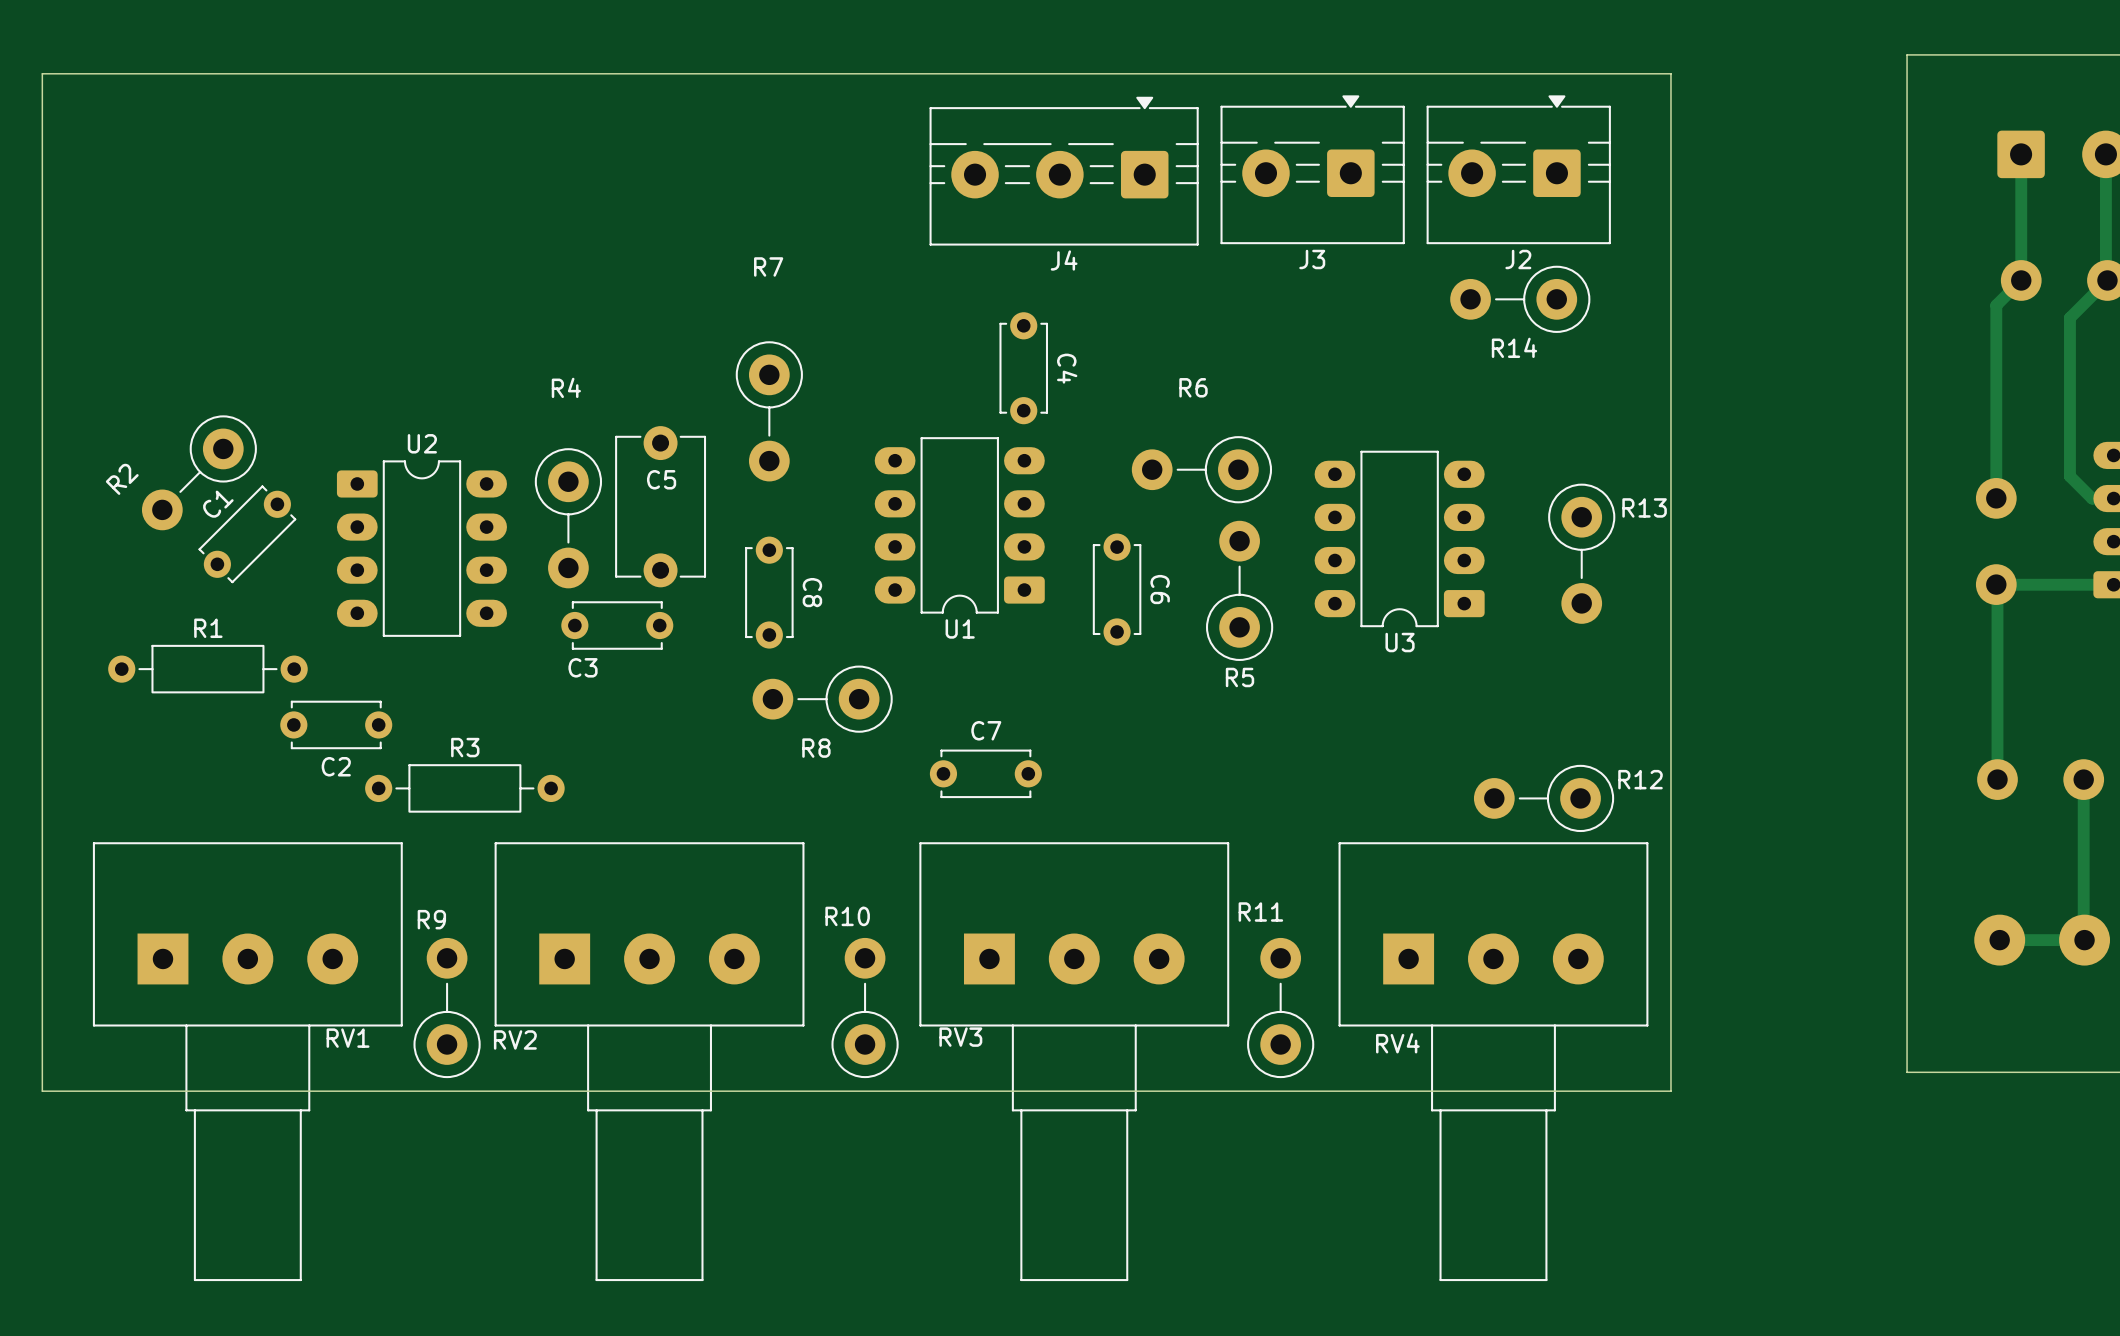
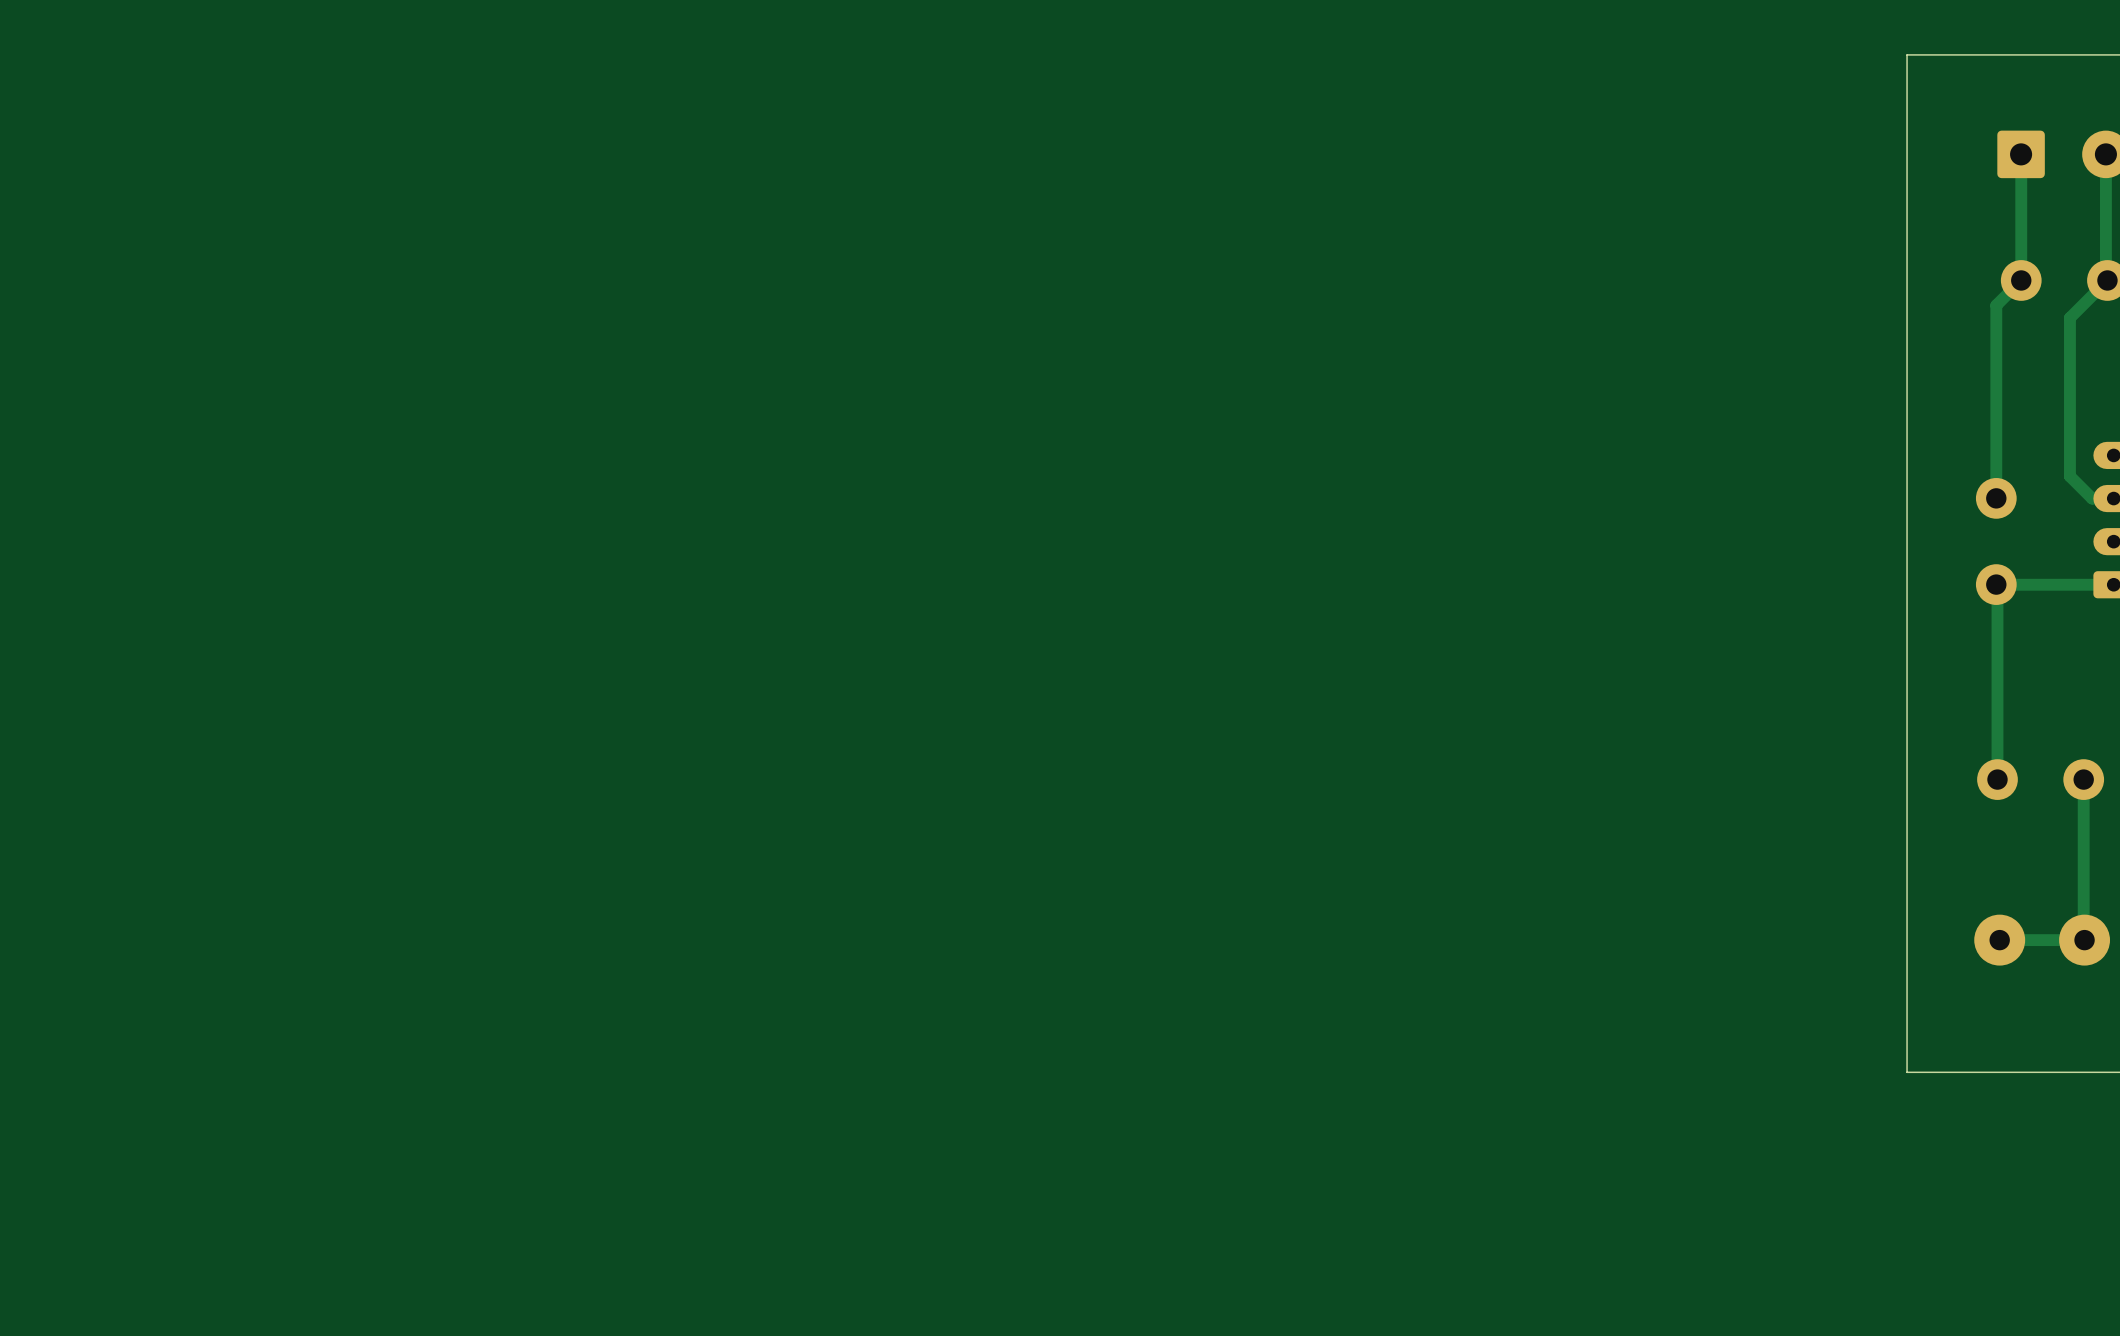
board edge: (1670, 73) (42, 73) (42, 1091) (1670, 1091) (1670, 73) -> none
J3: (1312, 169) -> none
J2: (1518, 169) -> none
J4: (1064, 171) -> none
R14: (1520, 299) -> none
C4: (1023, 368) -> none
R7: (769, 411) -> none
R6: (1201, 469) -> none
R2: (199, 472) -> none
C5: (660, 506) -> none
R4: (568, 518) -> none
U1: (959, 525) -> none
C1: (247, 534) -> none
U3: (1399, 538) -> none
U2: (421, 548) -> none
R13: (1581, 553) -> none
C6: (1117, 589) -> none
R5: (1239, 590) -> none
C8: (769, 592) -> none
C3: (617, 625) -> none
R1: (207, 669) -> none
R8: (822, 699) -> none
C2: (336, 724) -> none
C7: (985, 773) -> none
R3: (464, 788) -> none
R12: (1544, 798) -> none
R9: (447, 1008) -> none
R10: (865, 1008) -> none
R11: (1280, 1008) -> none
RV1: (247, 1061) -> none
RV2: (649, 1061) -> none
RV3: (1074, 1061) -> none
RV4: (1493, 1061) -> none

